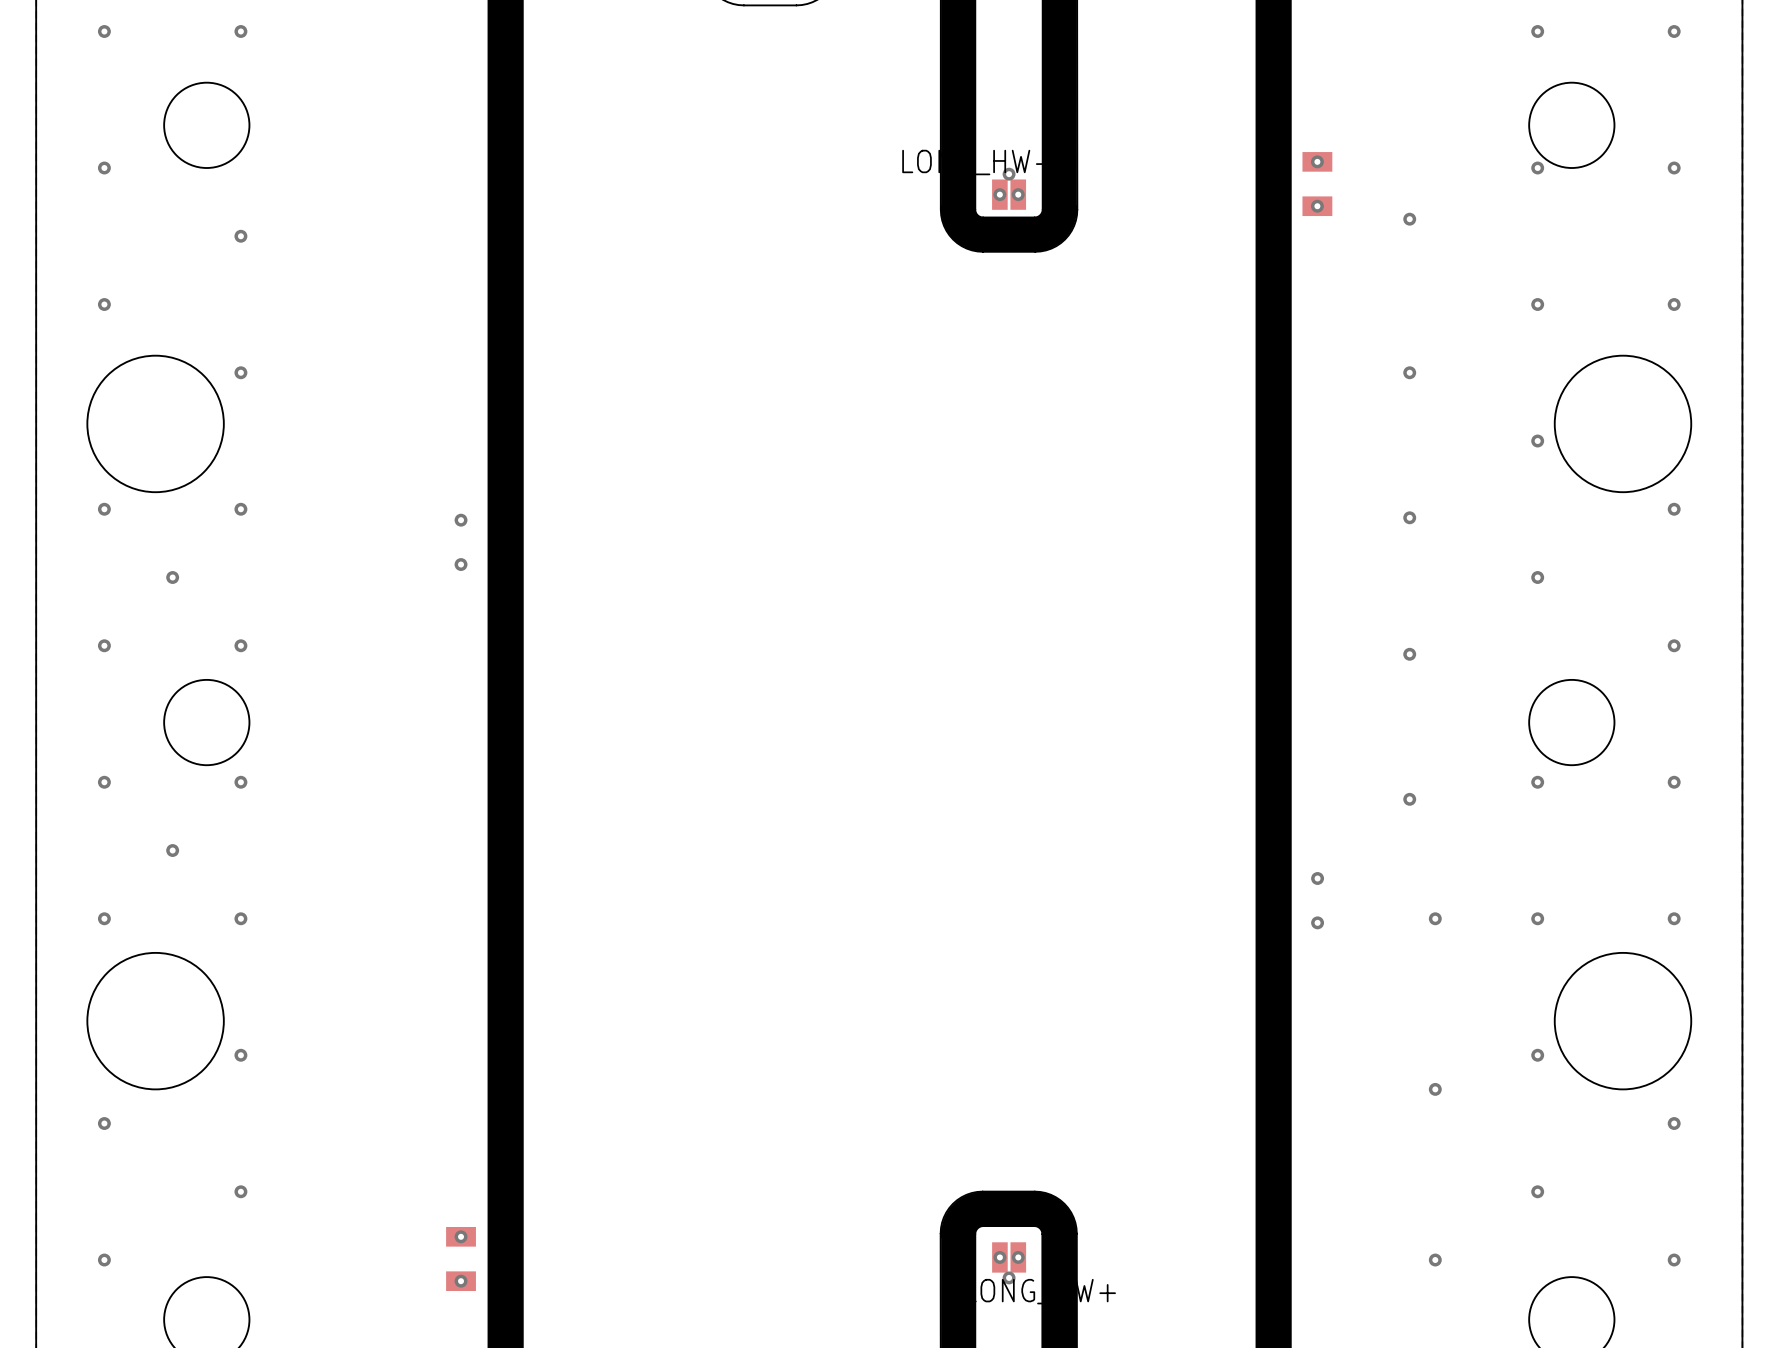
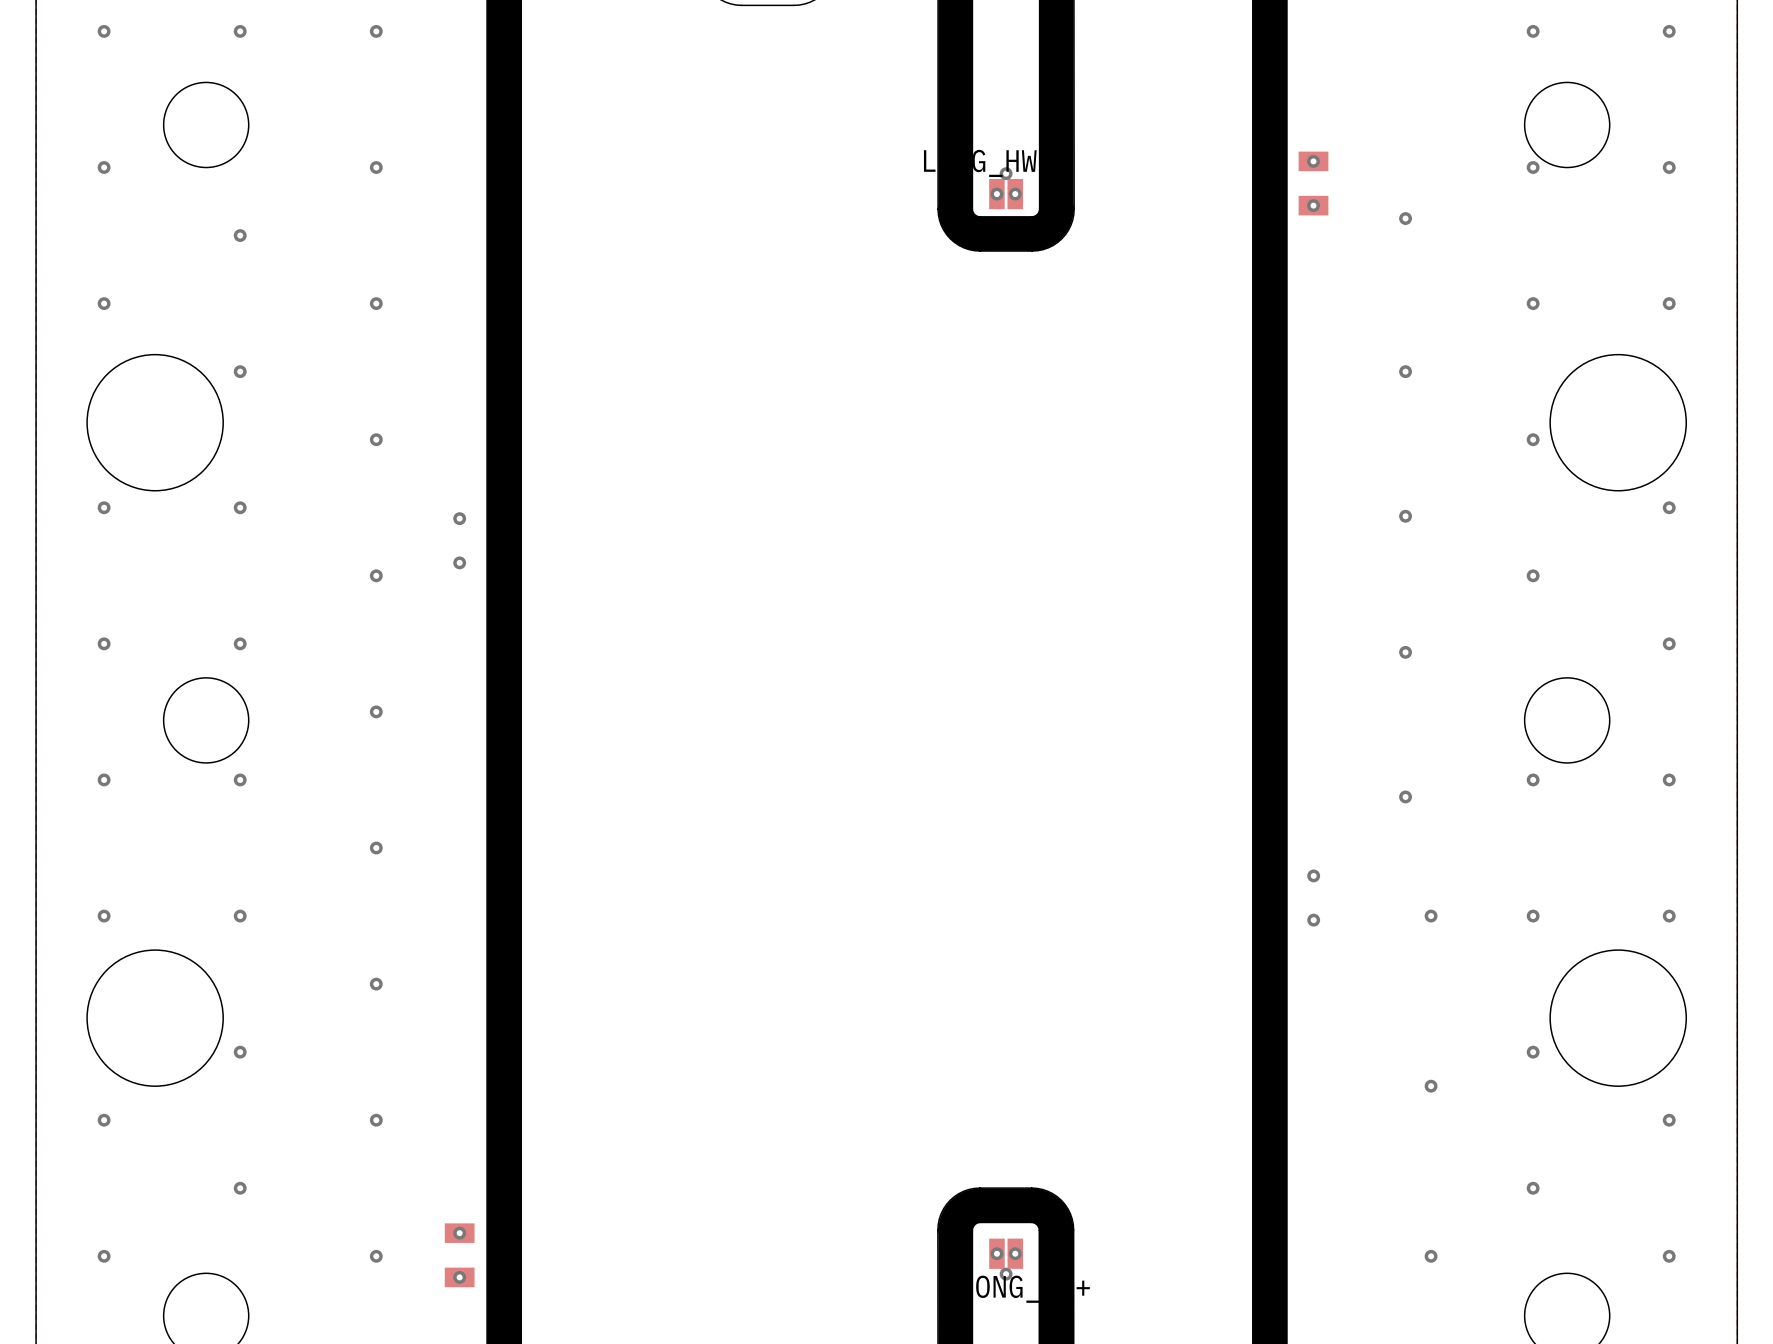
via: none -> (376, 31)
via: none -> (376, 167)
via: none -> (376, 303)
via: none -> (376, 439)
via: (172, 577) -> none
via: none -> (376, 575)
via: none -> (376, 711)
via: (172, 850) -> none
via: none -> (376, 848)
via: none -> (376, 984)
via: none -> (376, 1120)
via: none -> (376, 1256)

